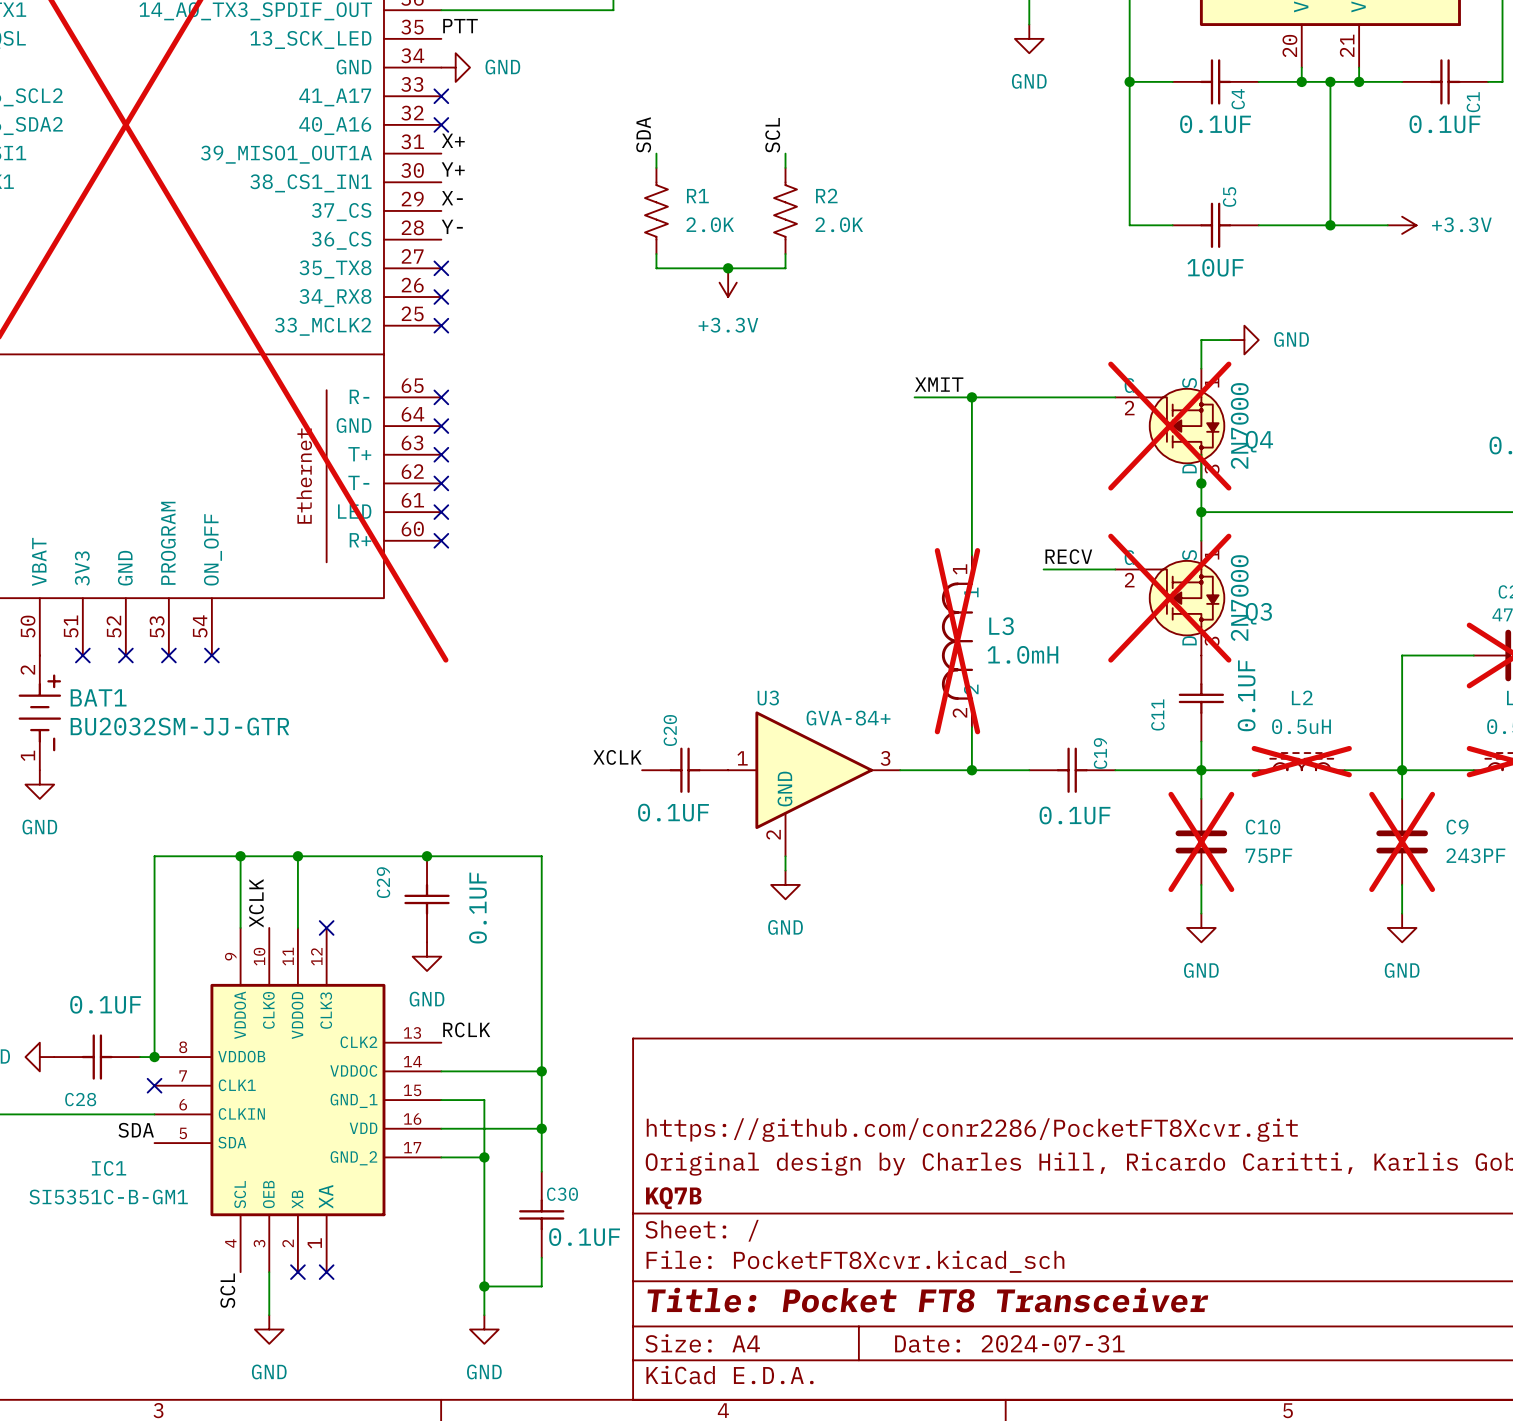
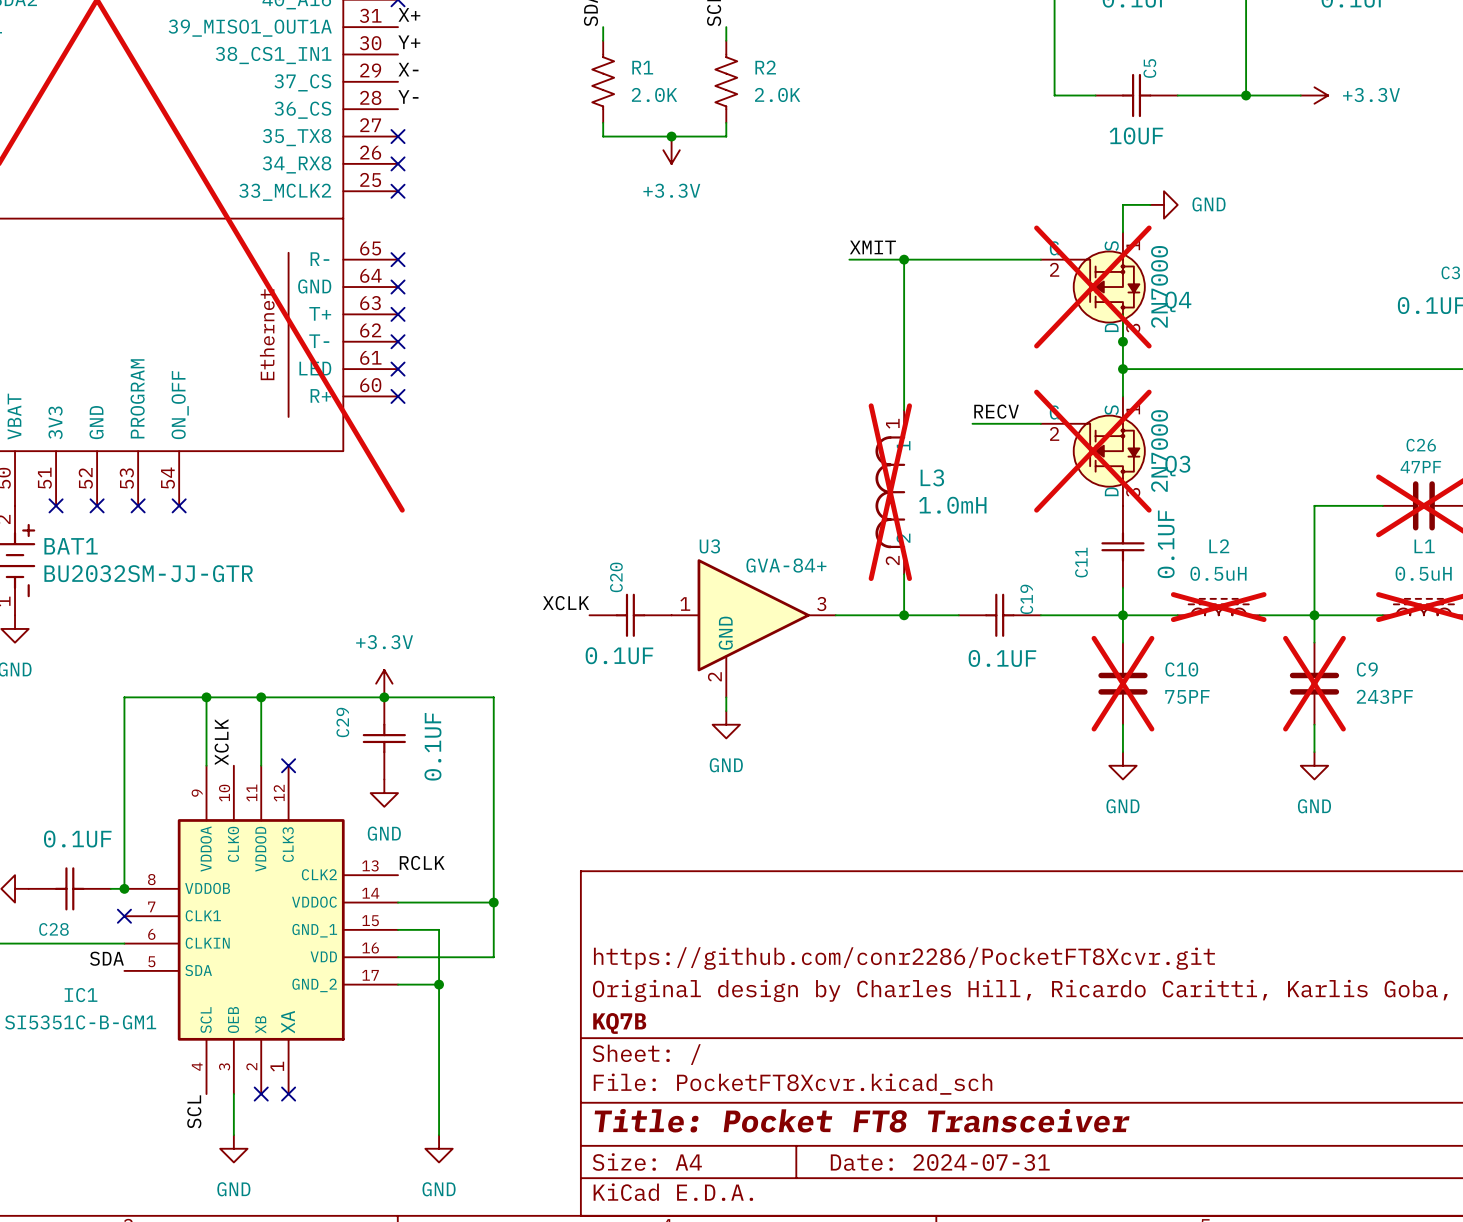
power symbol: none -> +3.3V (384, 683)
wire: (541, 1128) (541, 1171) -> none
junction: (541, 1128) -> none
C30: 0.1UF (541, 1214) -> none
wire: (541, 1257) (541, 1286) (484, 1286) -> none
junction: (484, 1286) -> none

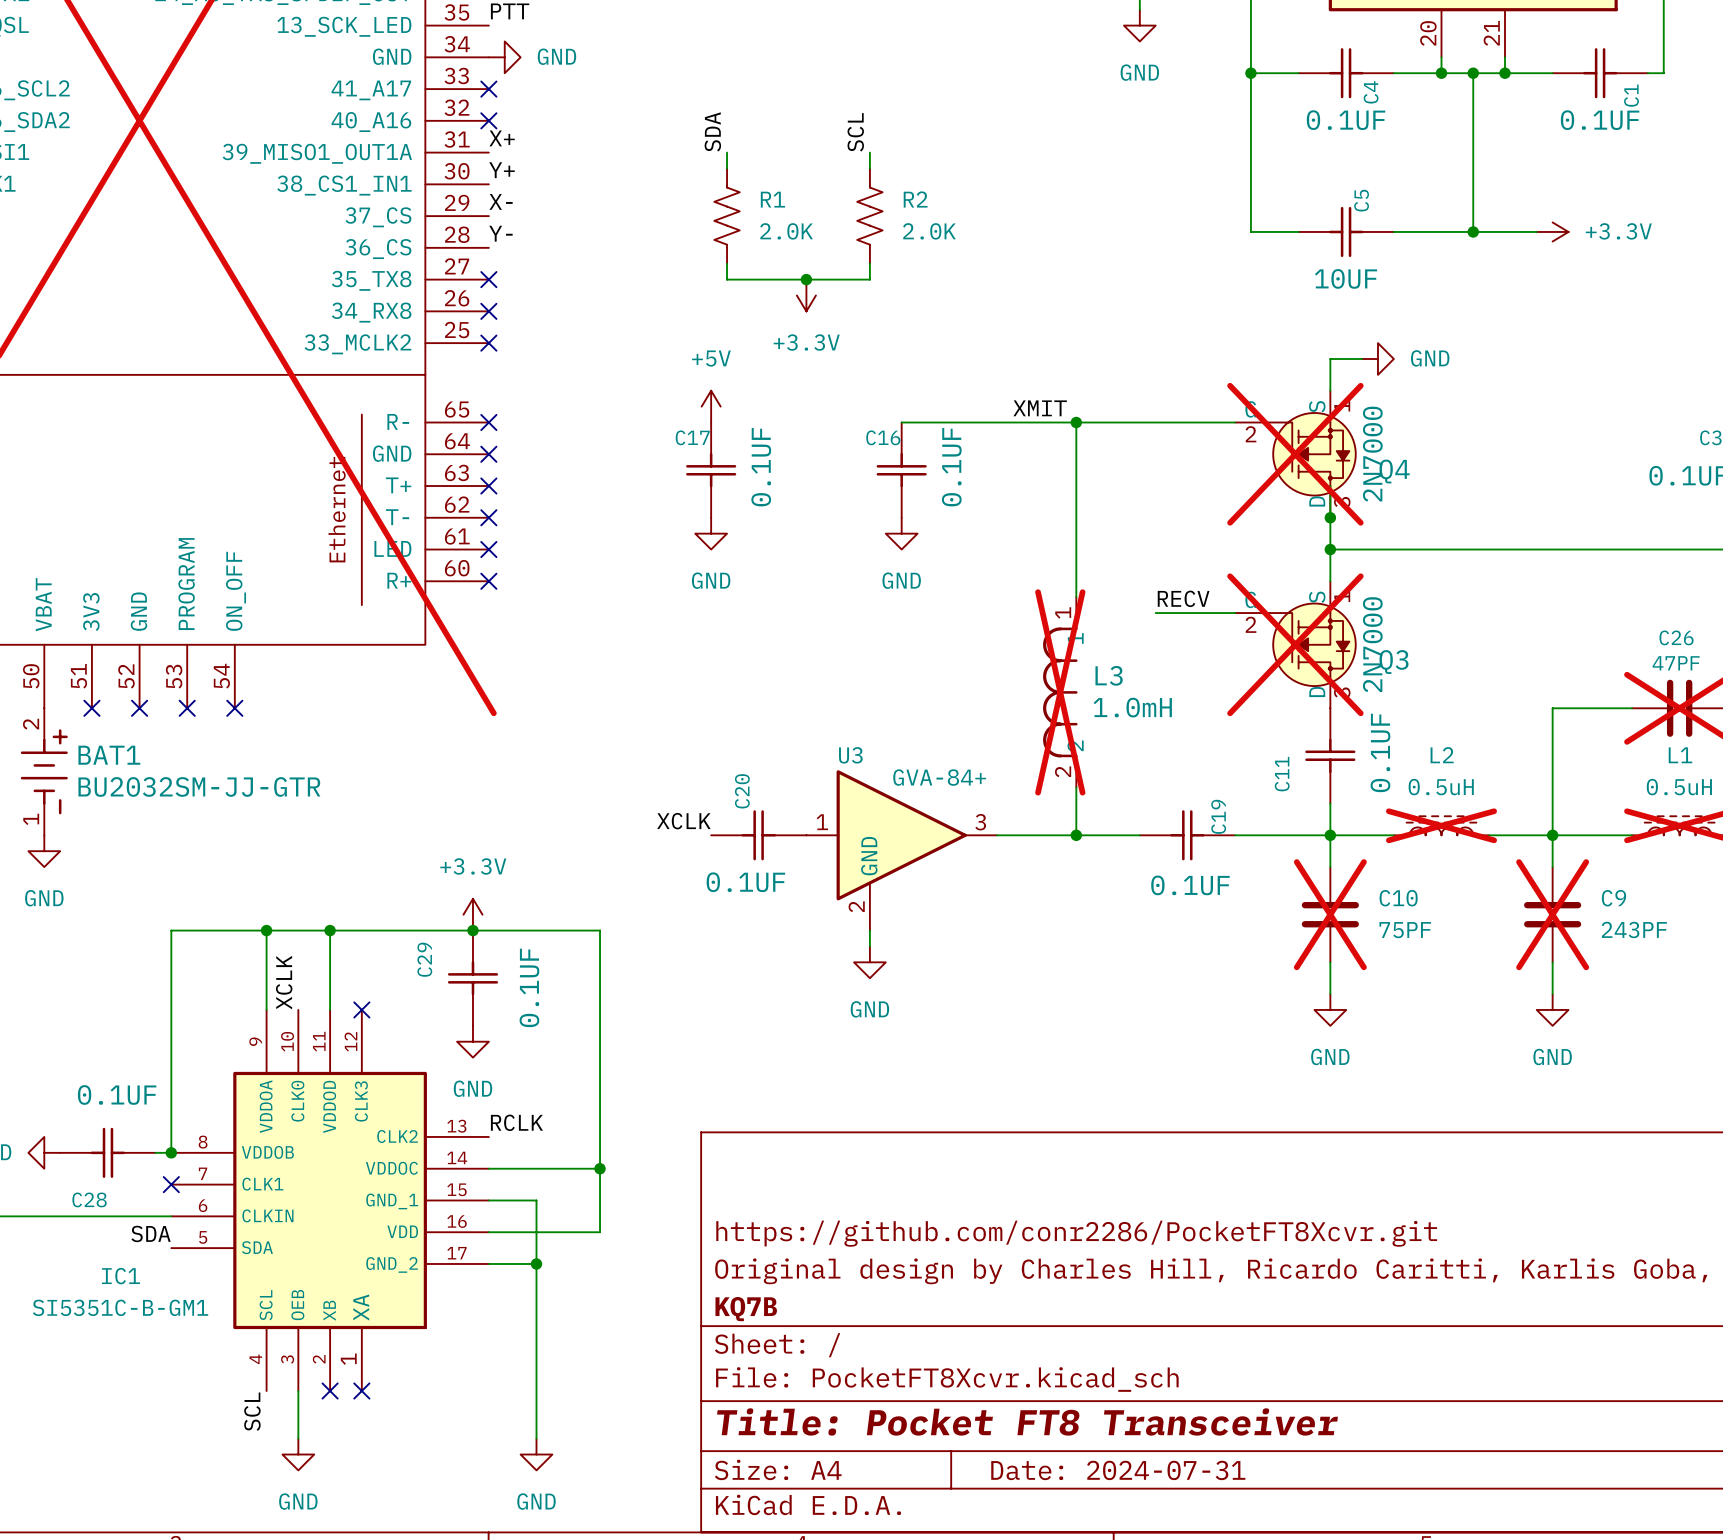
power symbol: none -> +5V (711, 406)
wire: none -> (901, 422) (1012, 422)
C17: none -> 0.1UF (711, 470)
C16: none -> 0.1UF (901, 470)
power symbol: none -> GND (711, 533)
power symbol: none -> GND (901, 533)

